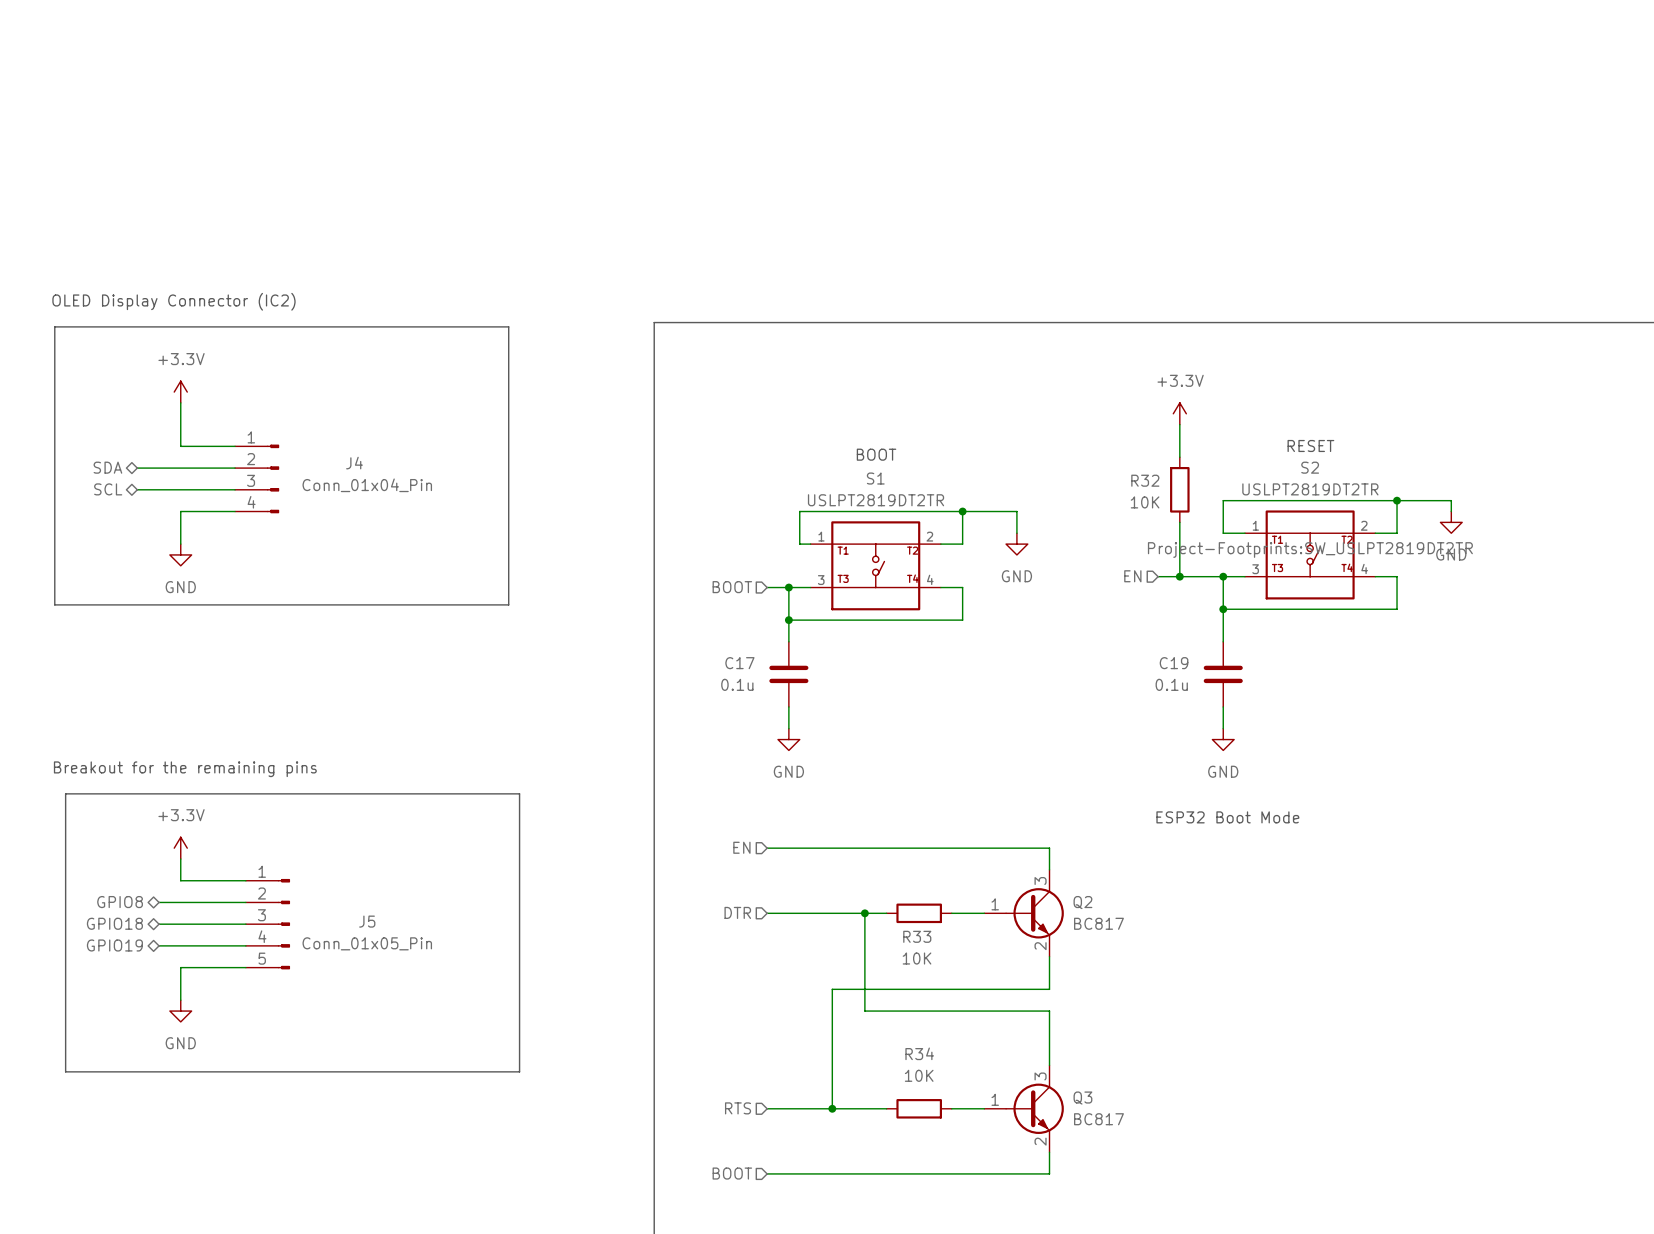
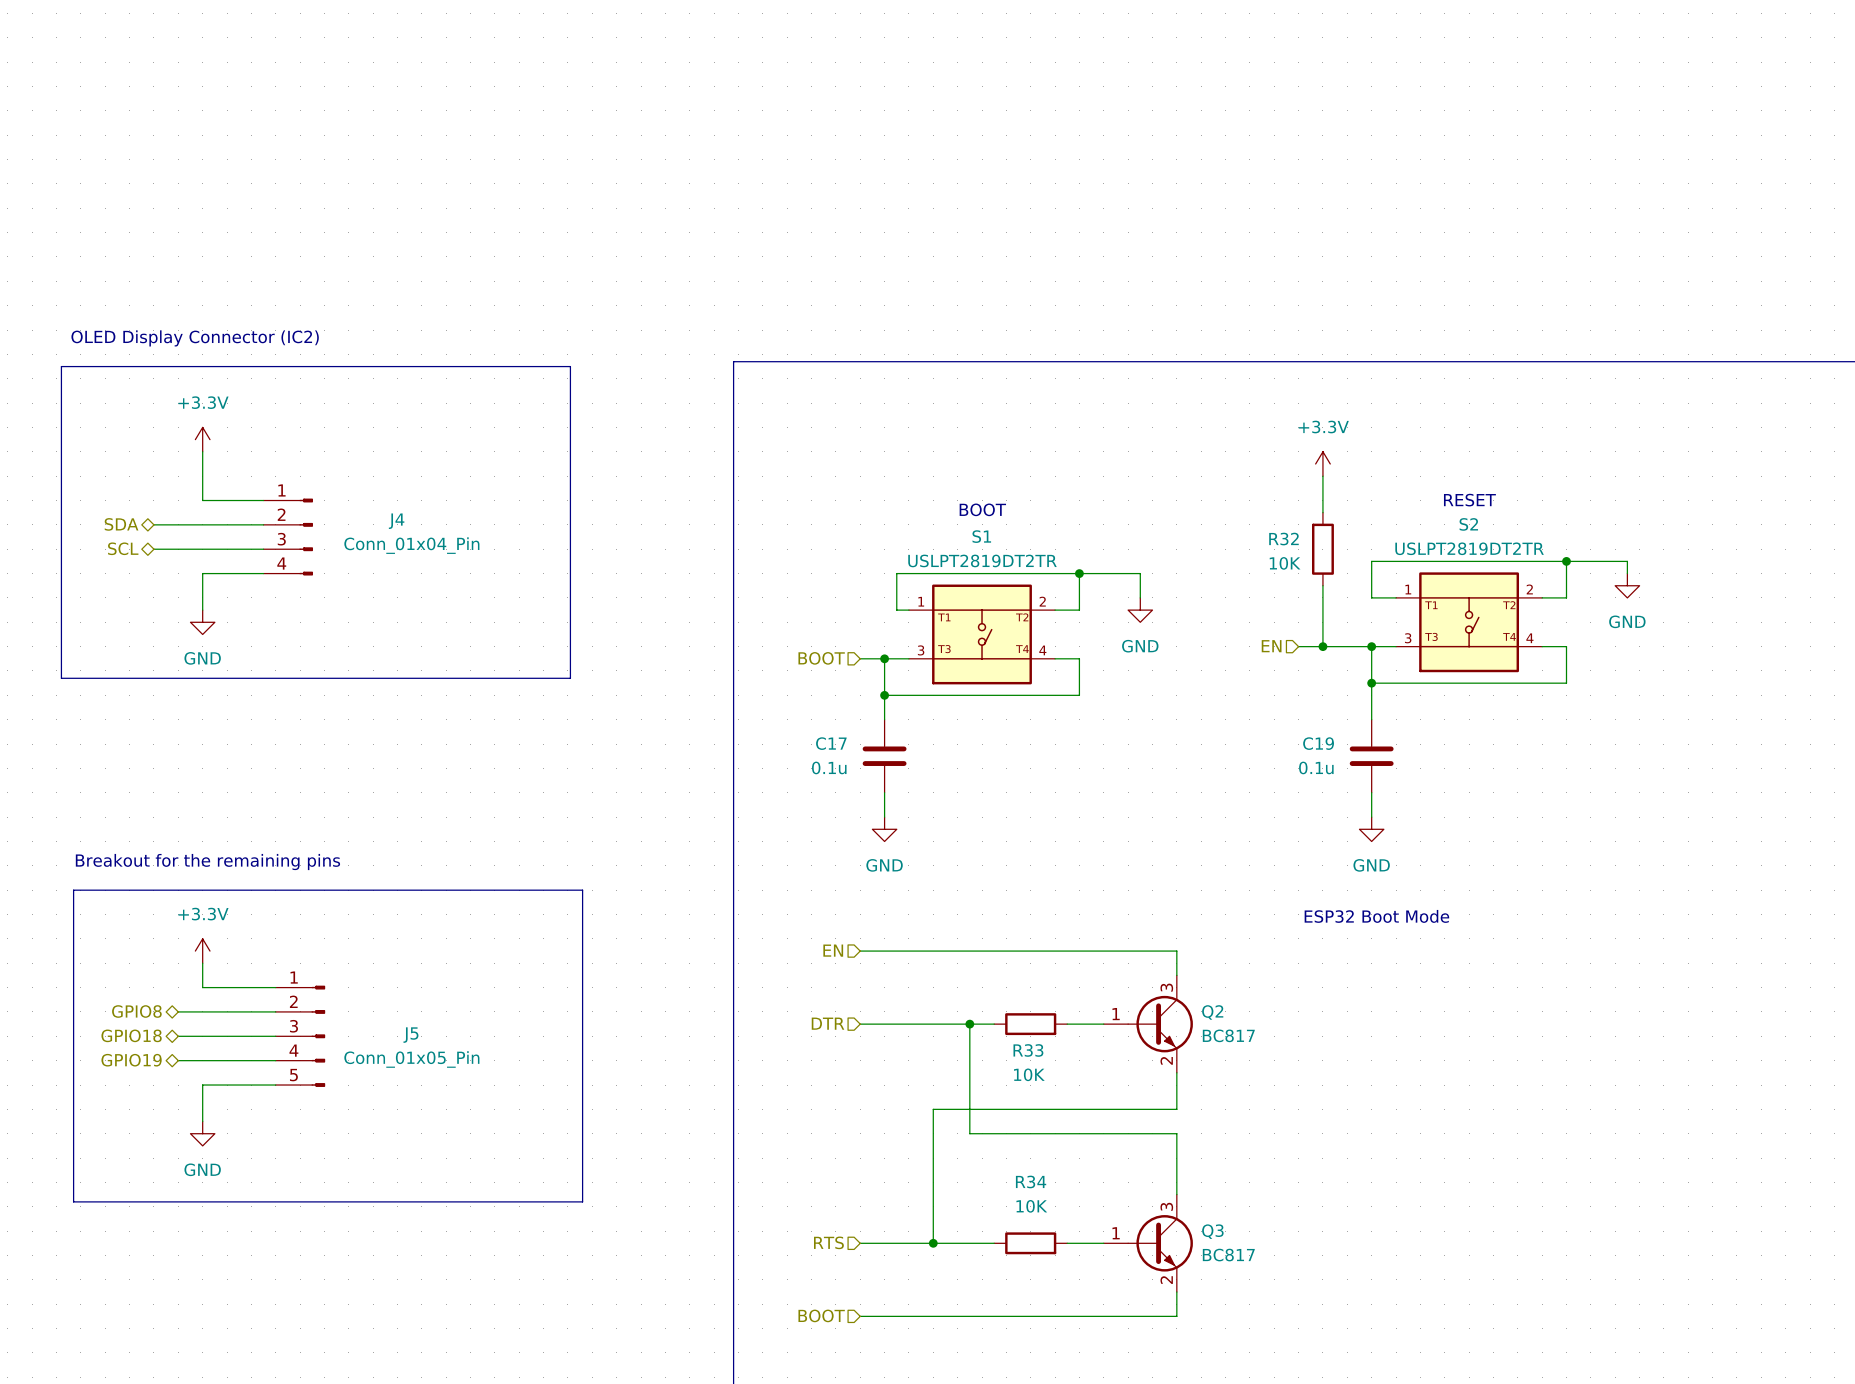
S2 text: Project-Footprints:SW_USLPT2819DT2TR (1310, 550) -> none

